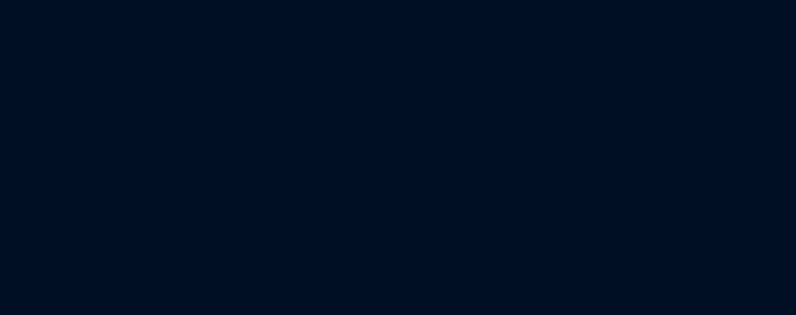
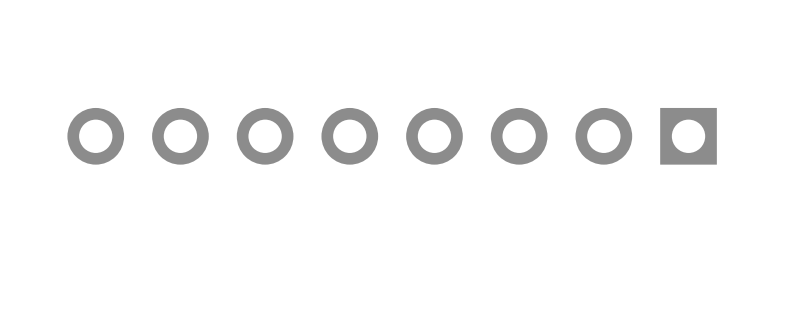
part: none -> (392, 136)

